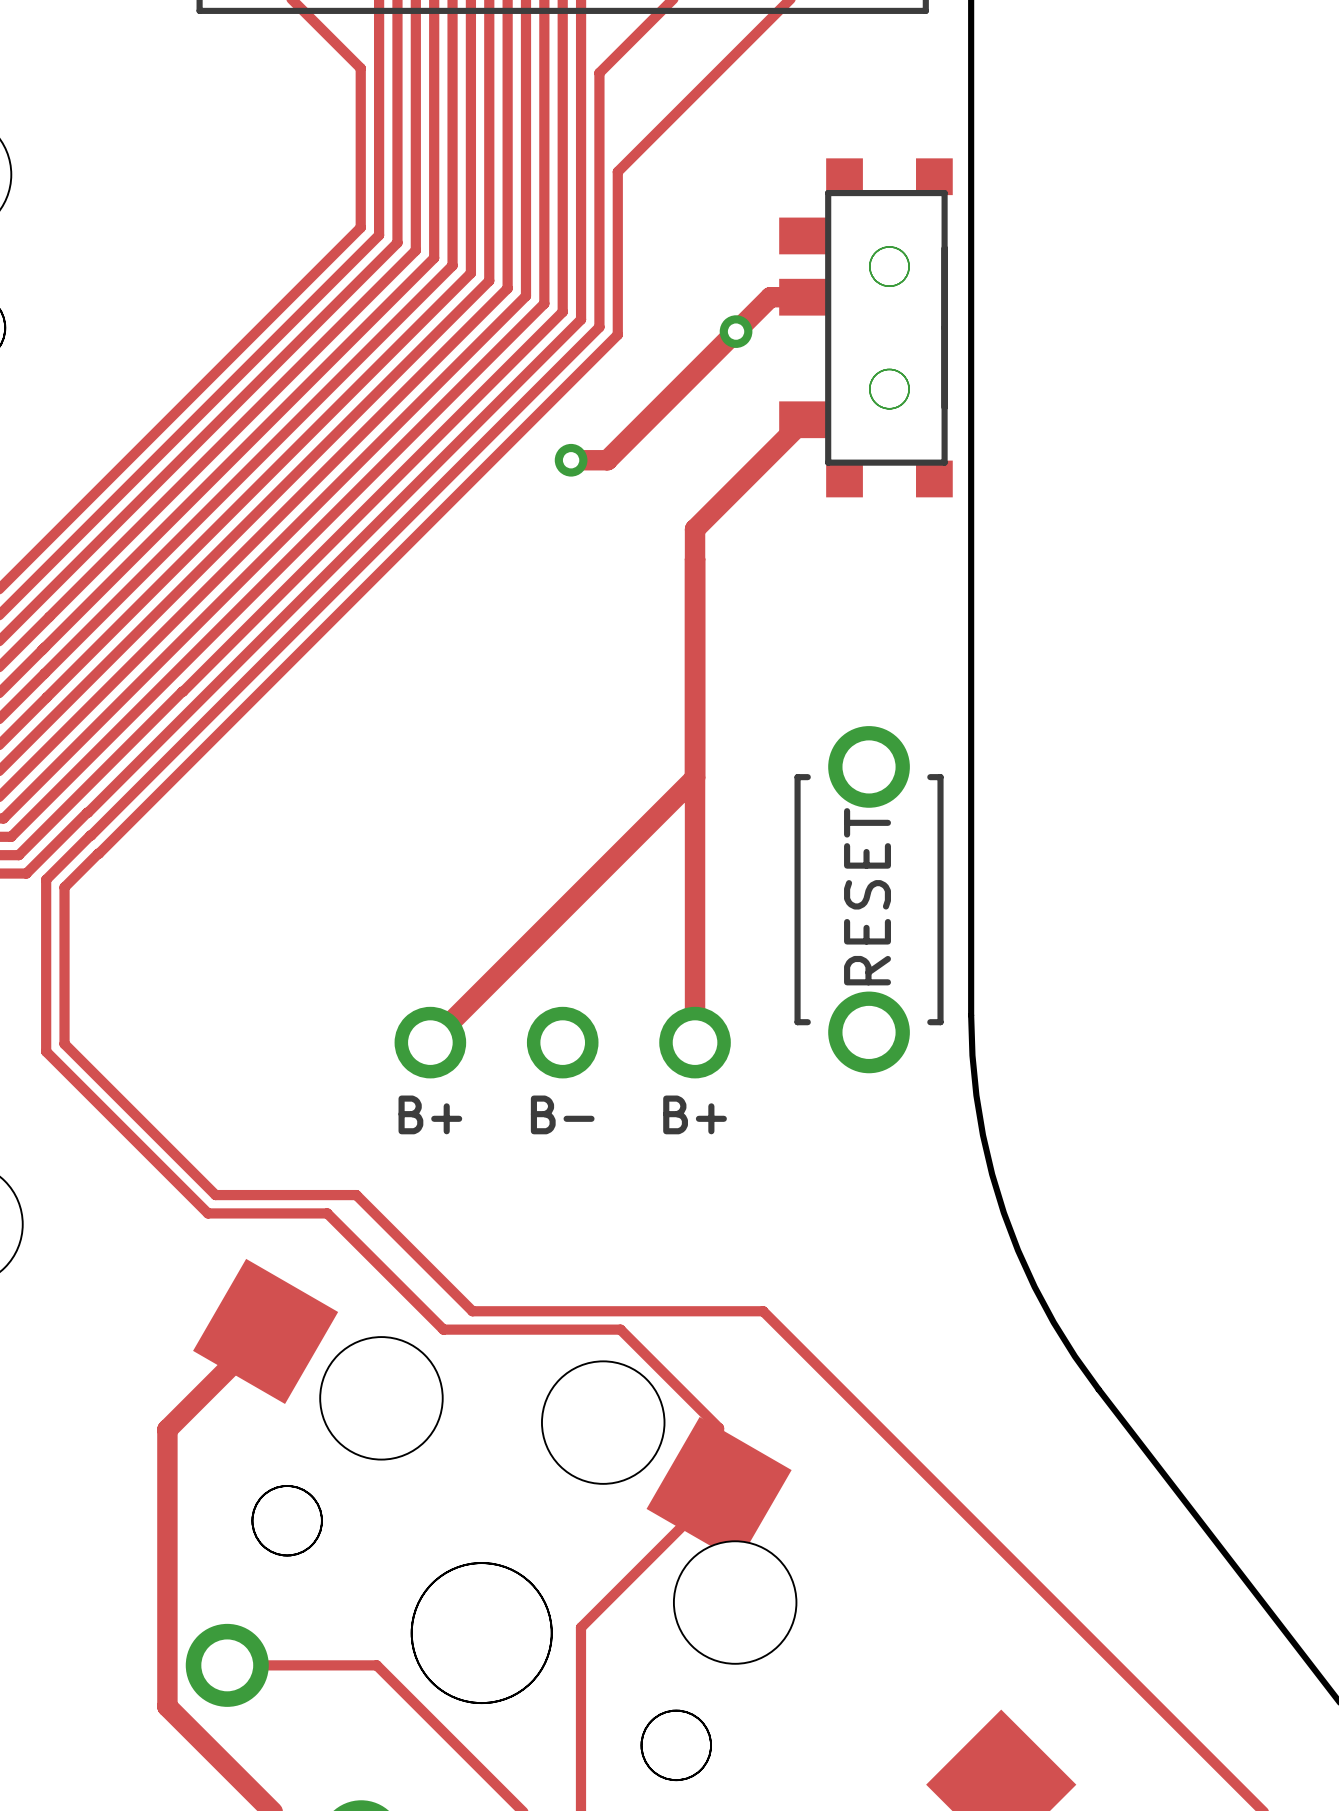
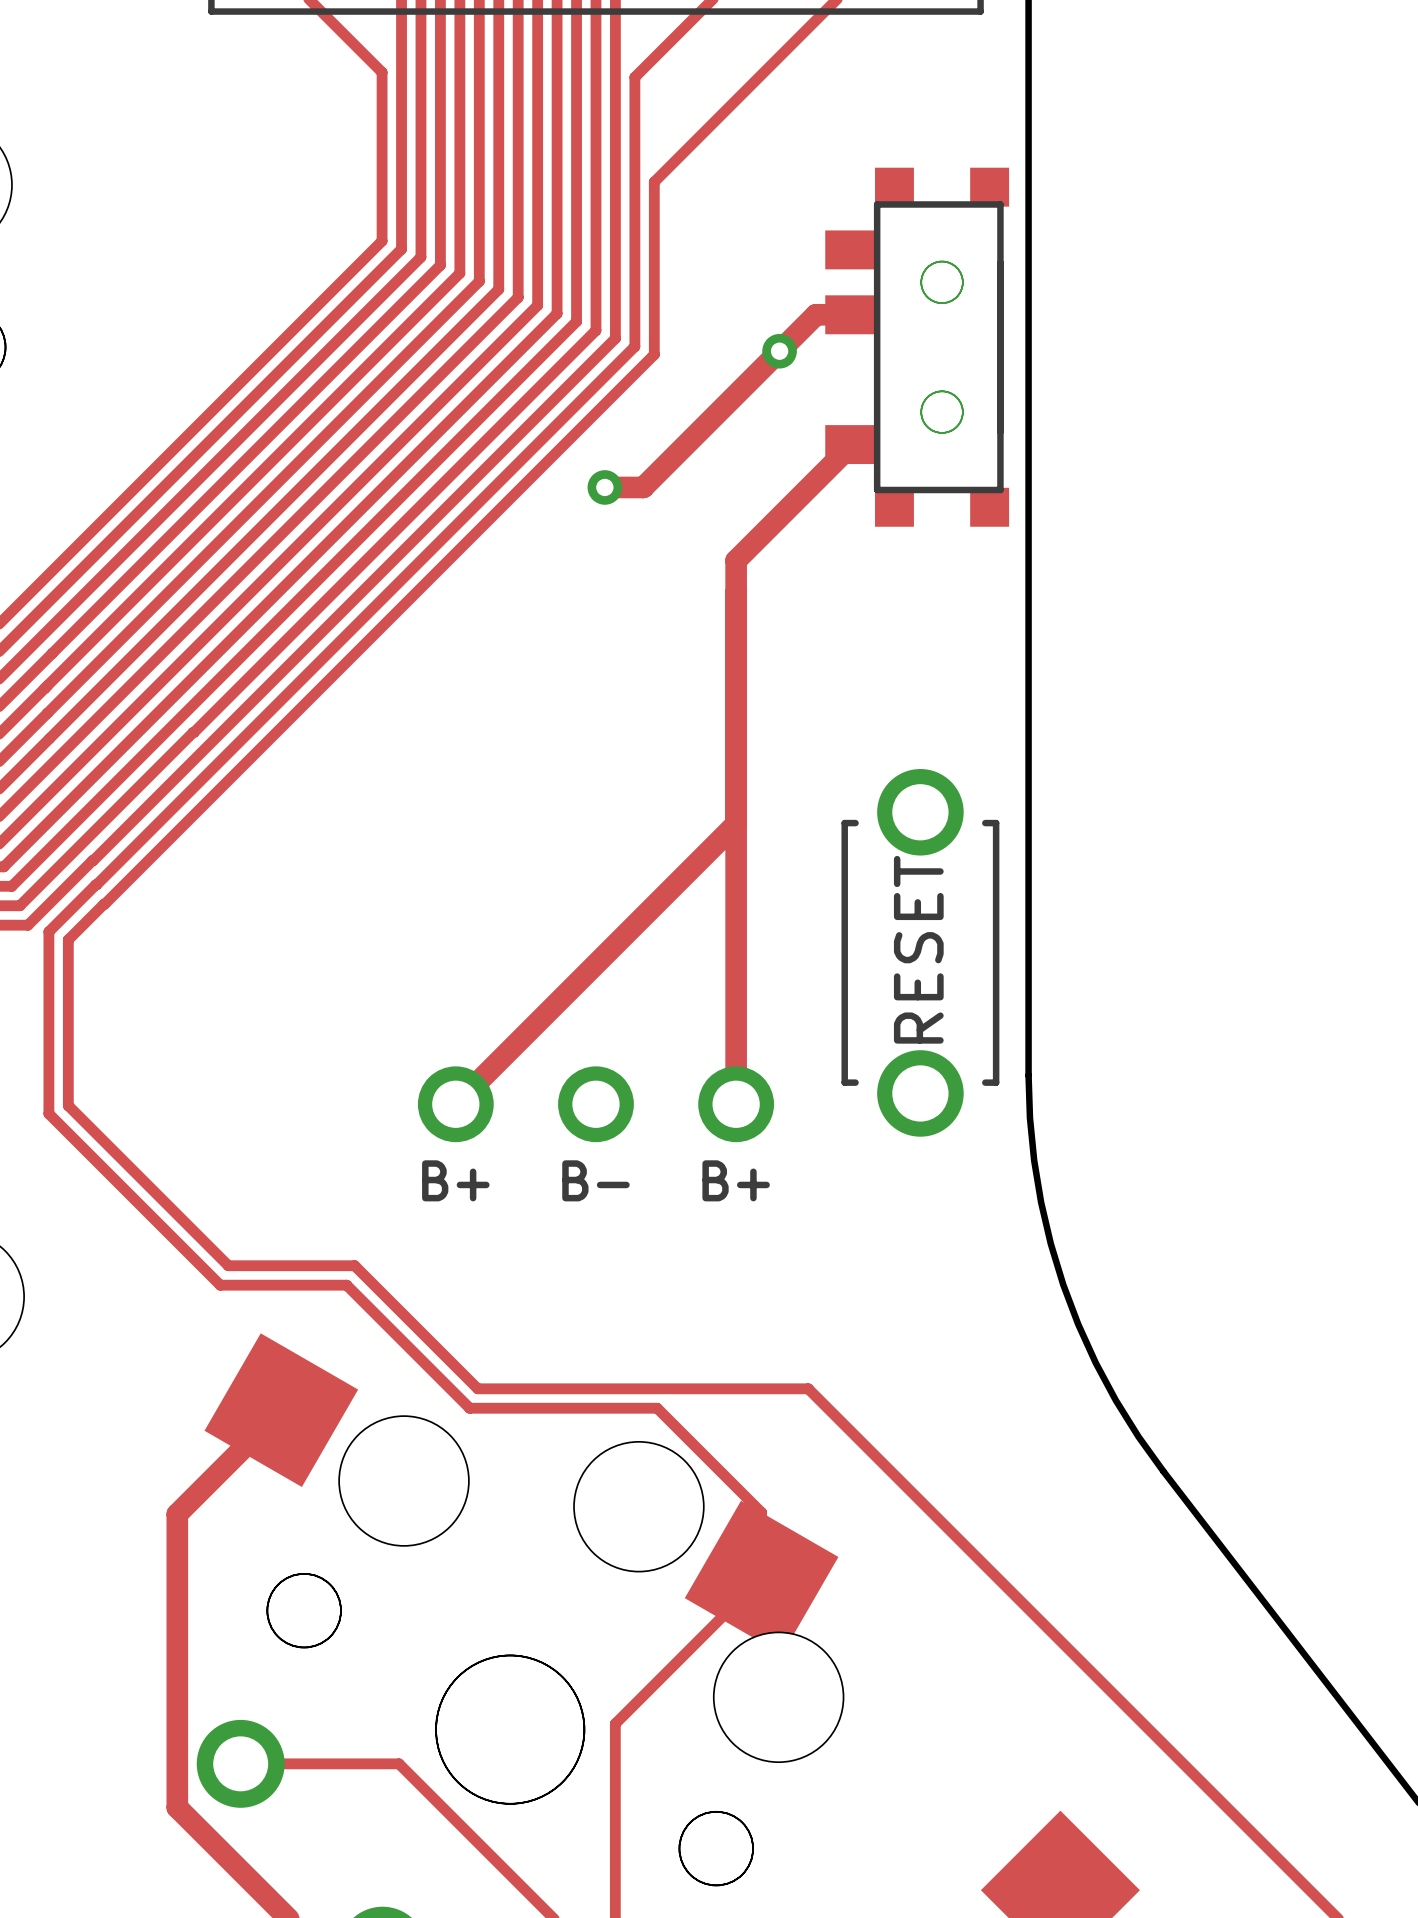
track: (334, 1195) (356, 1195) (472, 1311) -> (354, 1265) (477, 1388) (500, 1388)

